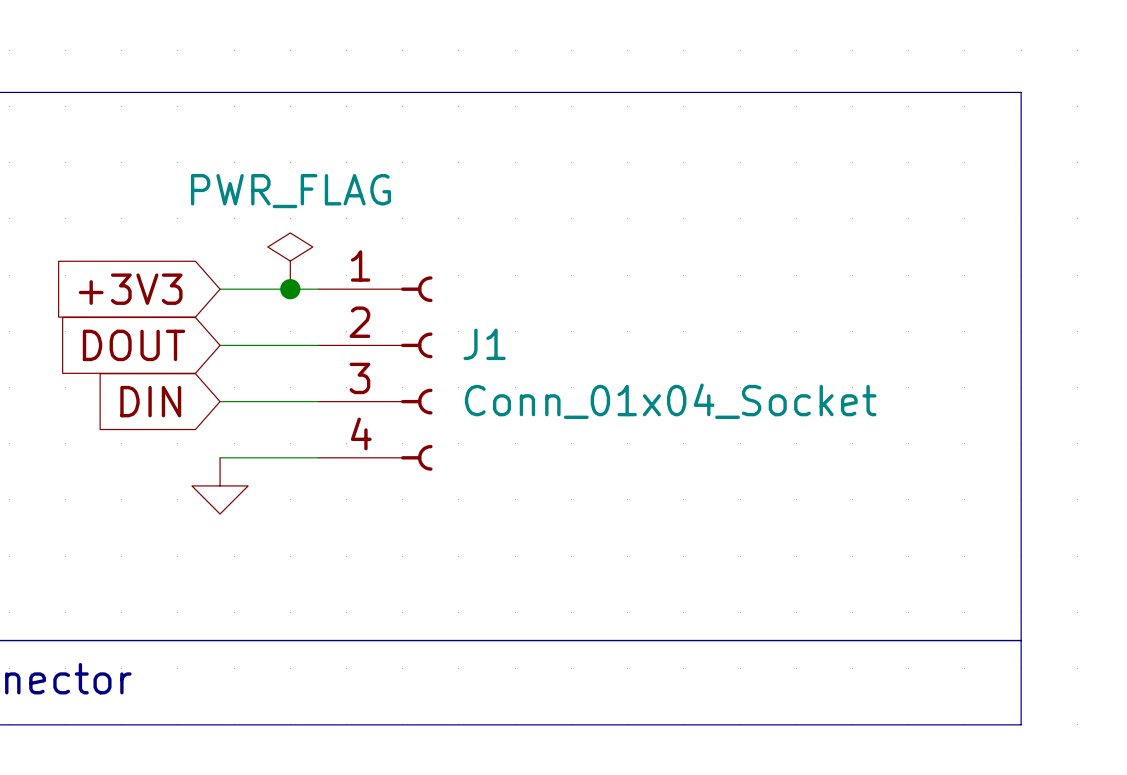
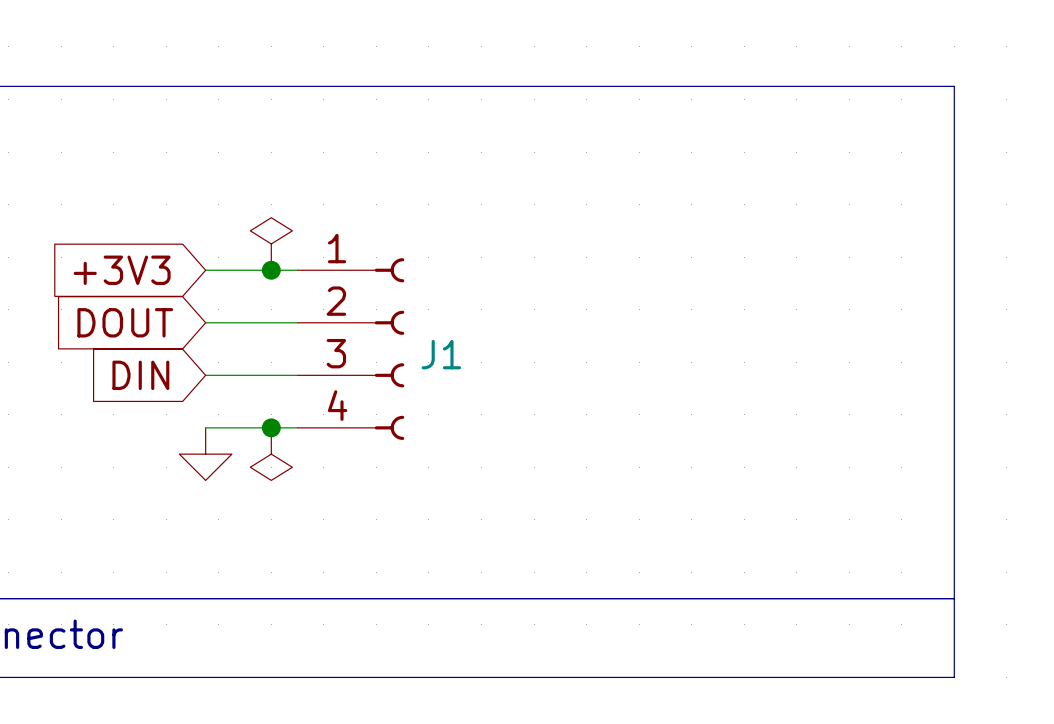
power symbol text: PWR_FLAG (290, 191) -> none
J1 name position: J1 (484, 344) -> J1 (441, 354)
J1 value: Conn_01x04_Socket (670, 401) -> none
junction: none -> (271, 427)
power symbol: none -> (271, 454)

